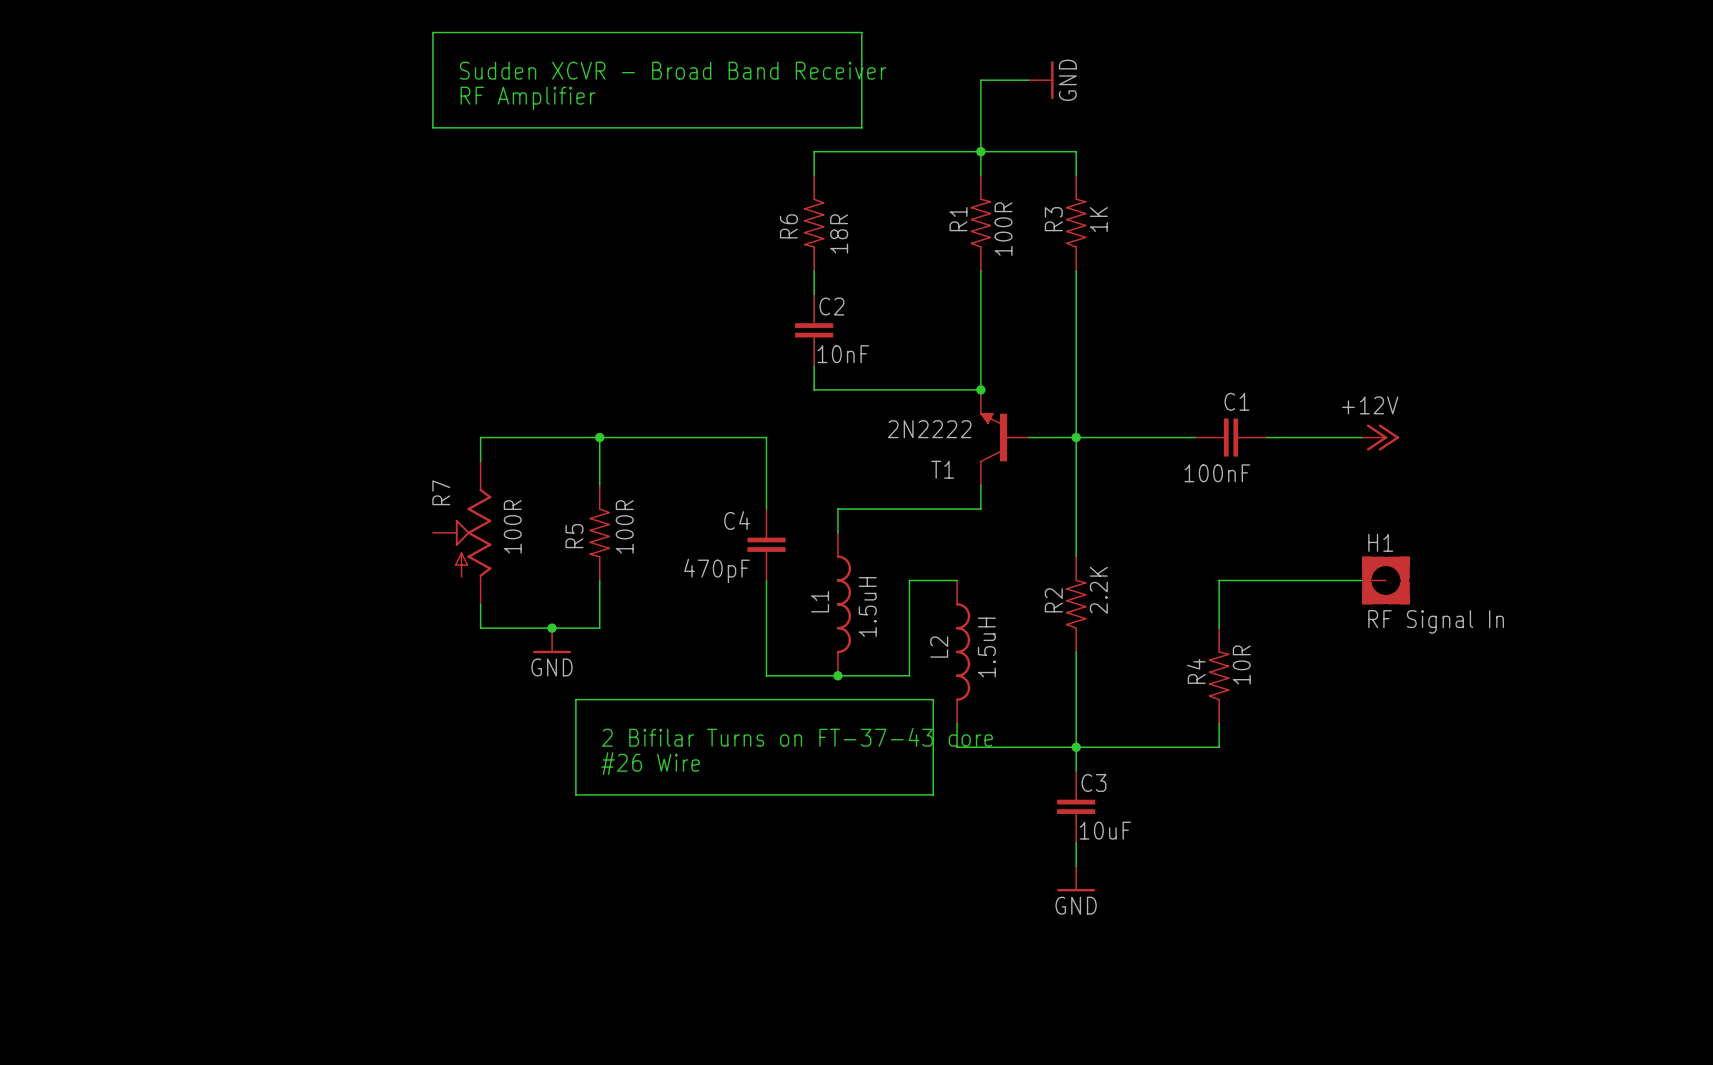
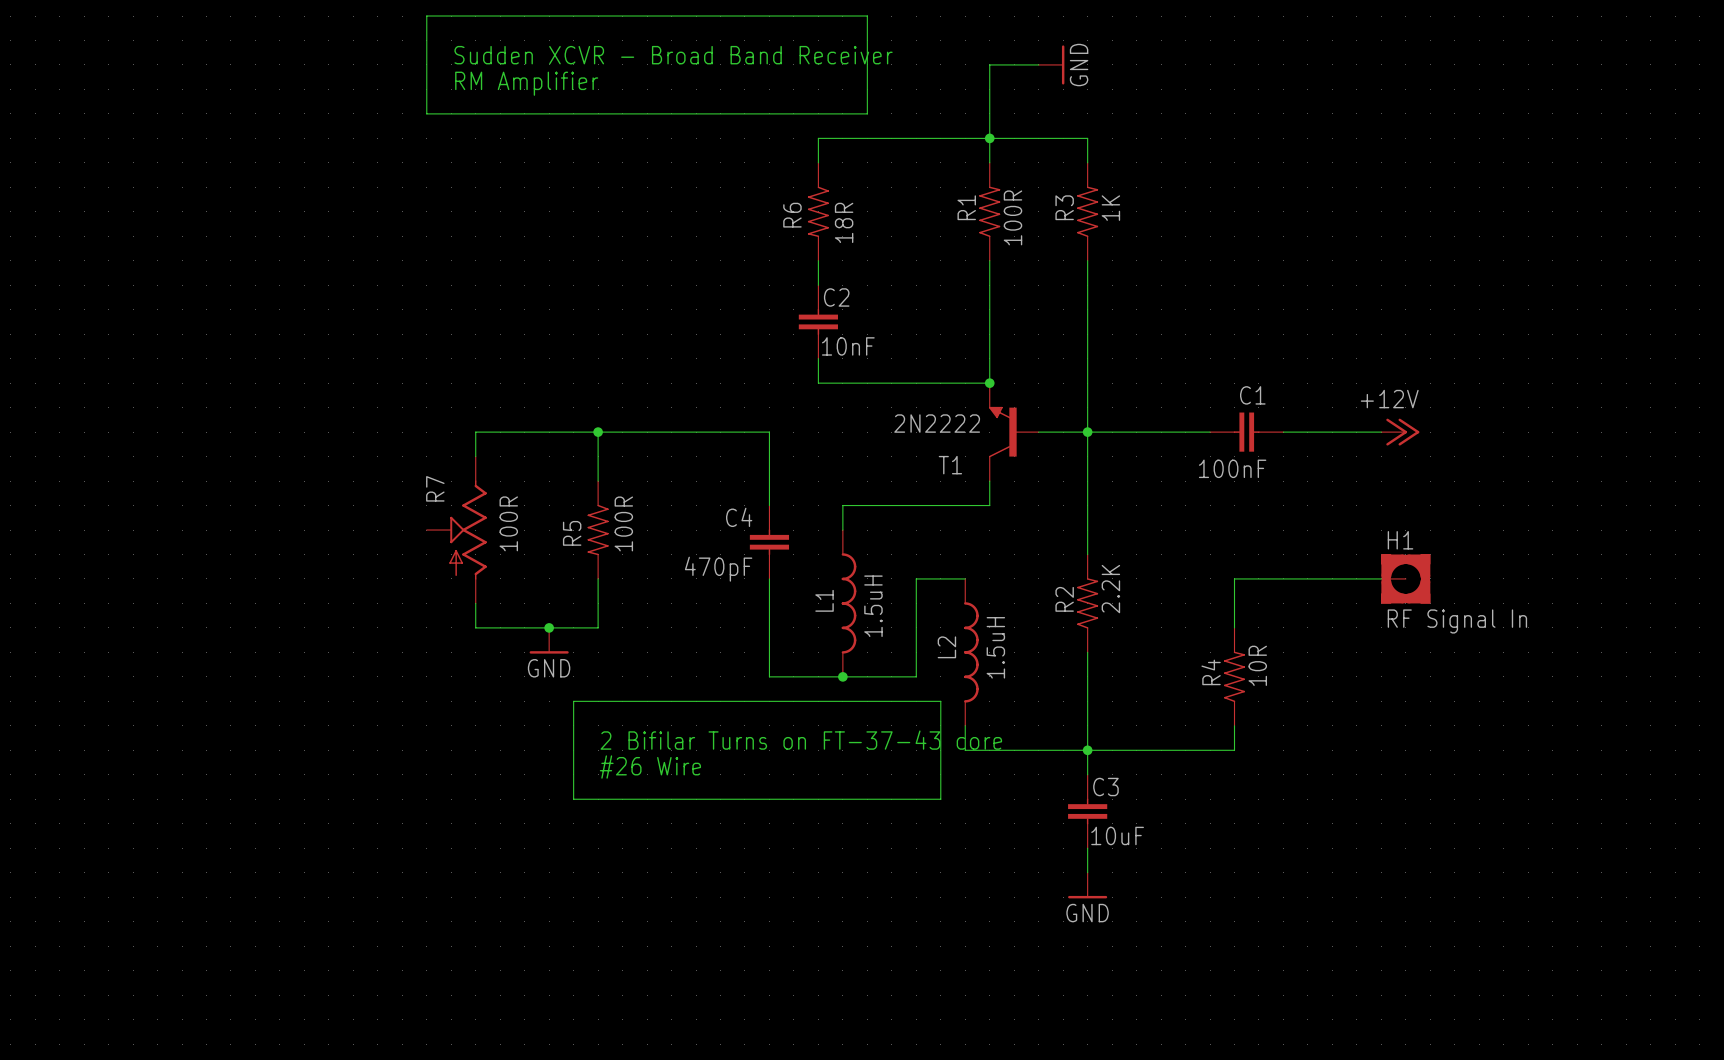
text: RF Amplifier (528, 98) -> RM Amplifier (526, 83)

